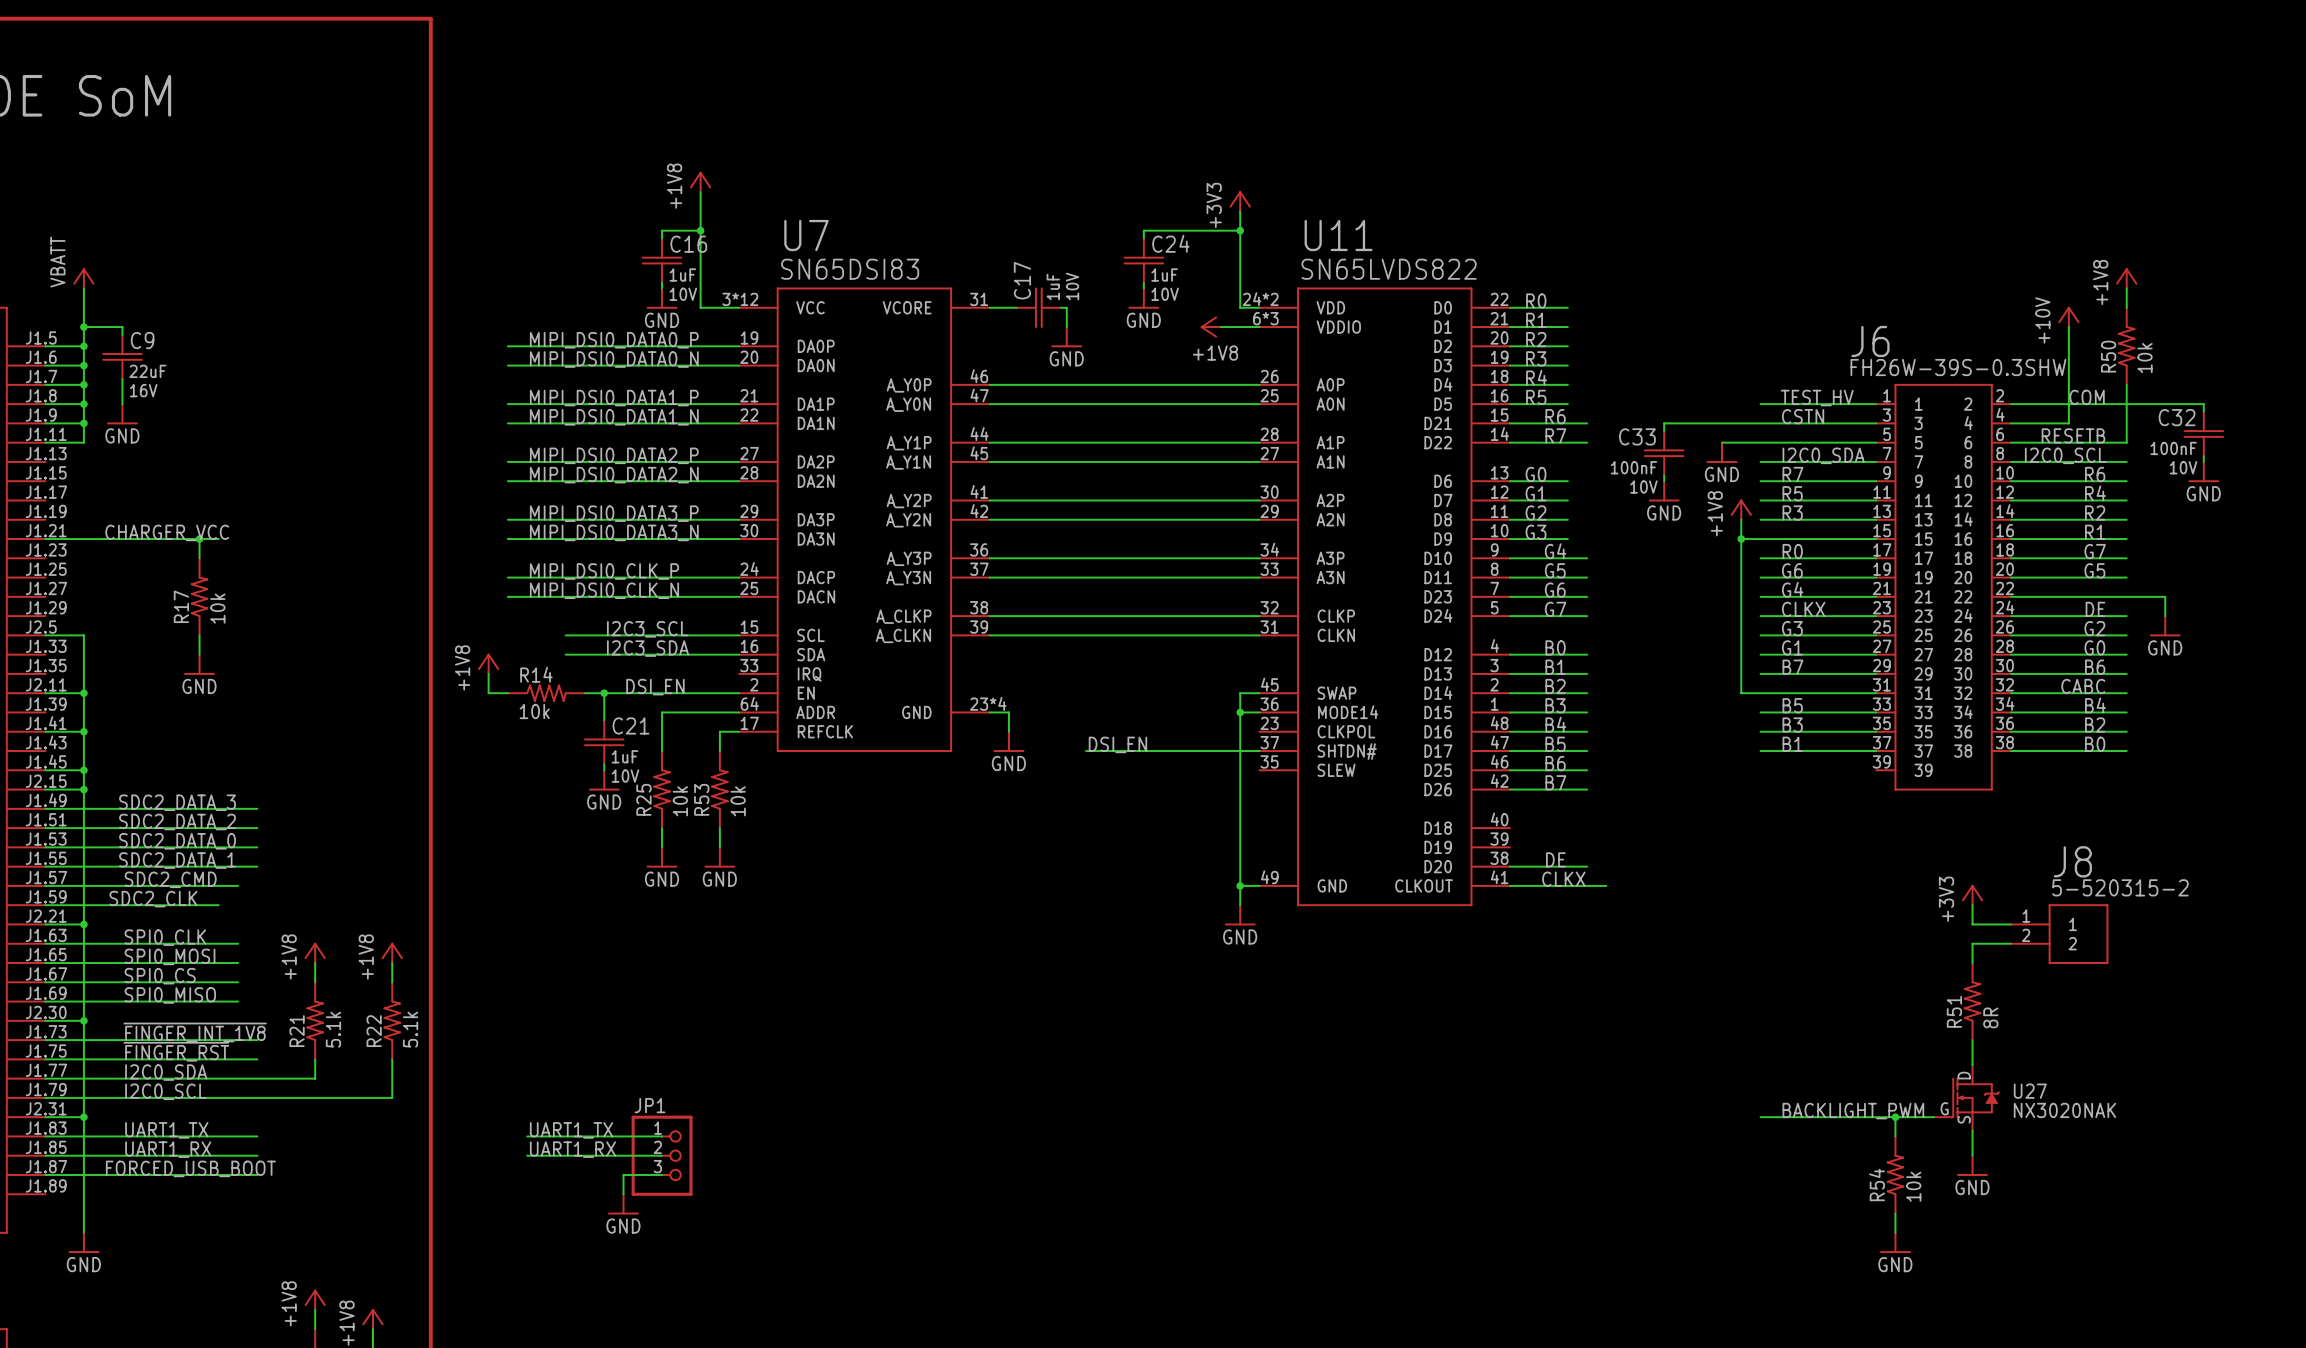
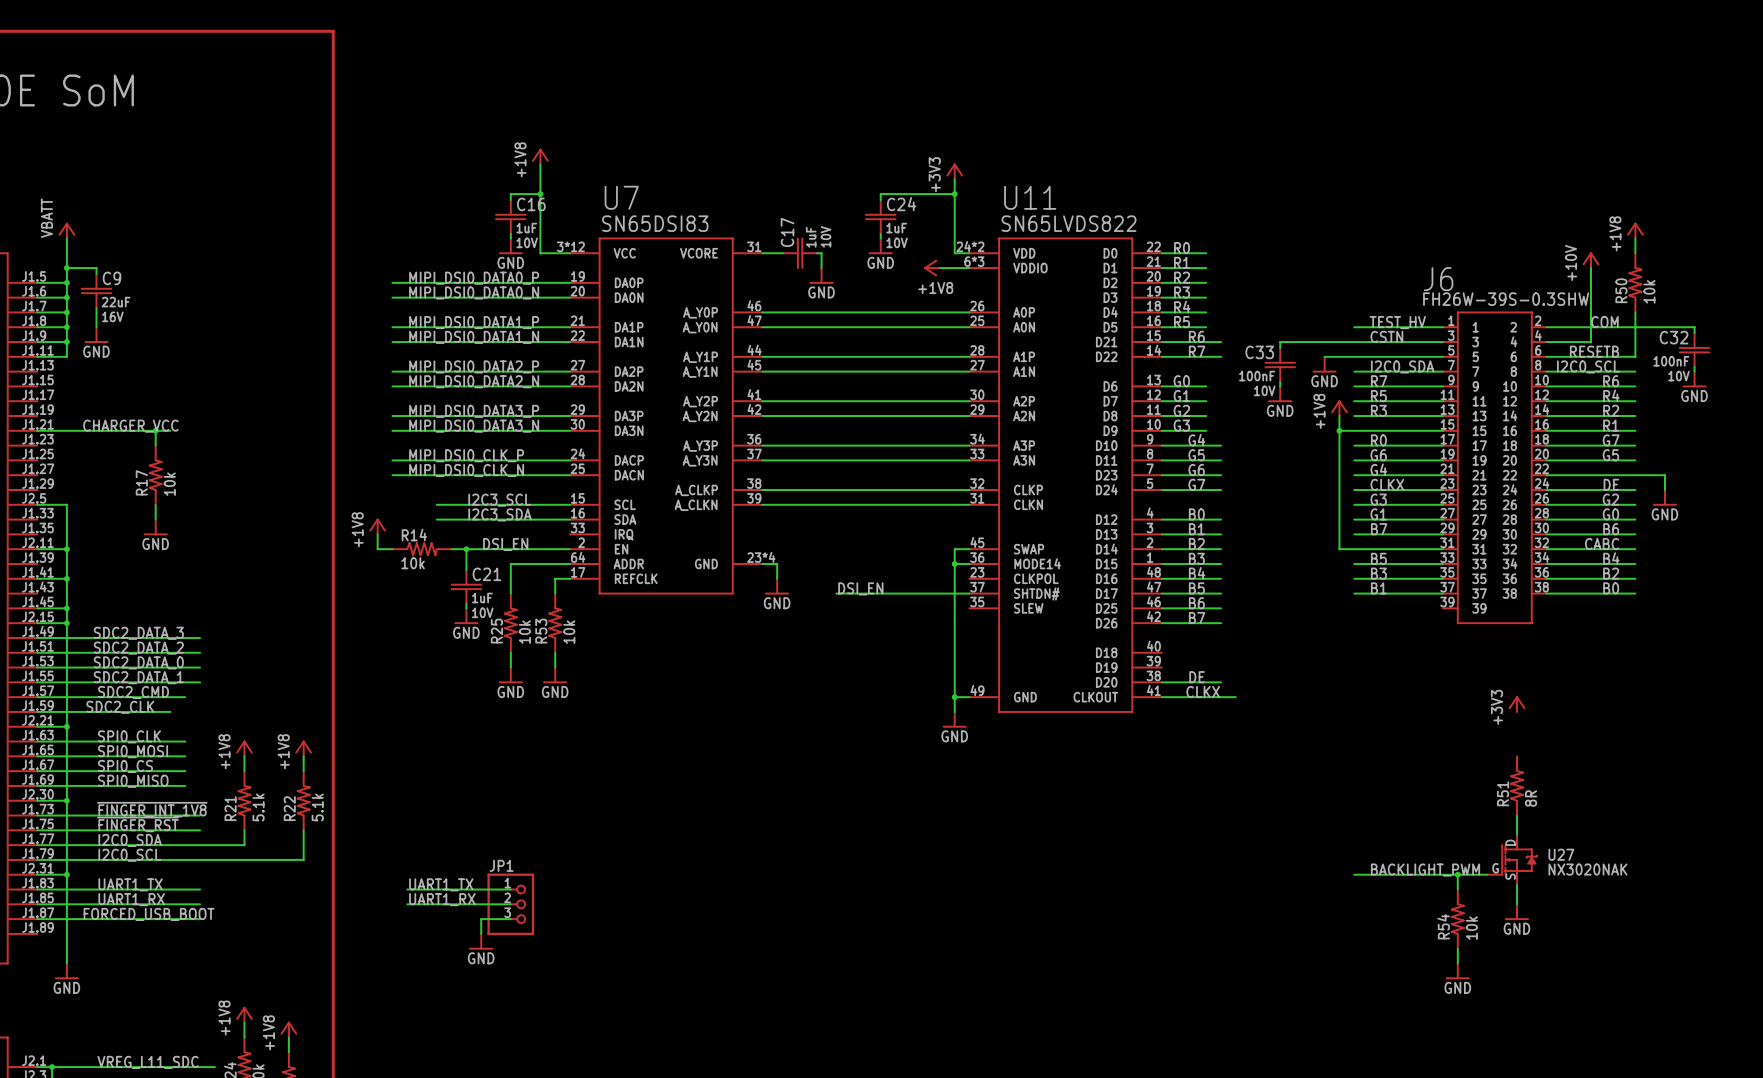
wire: (1972, 905) (1972, 924) (2011, 924) -> none
J8: (2059, 934) -> none
wire: (2011, 943) (1972, 943) (1972, 963) -> none

